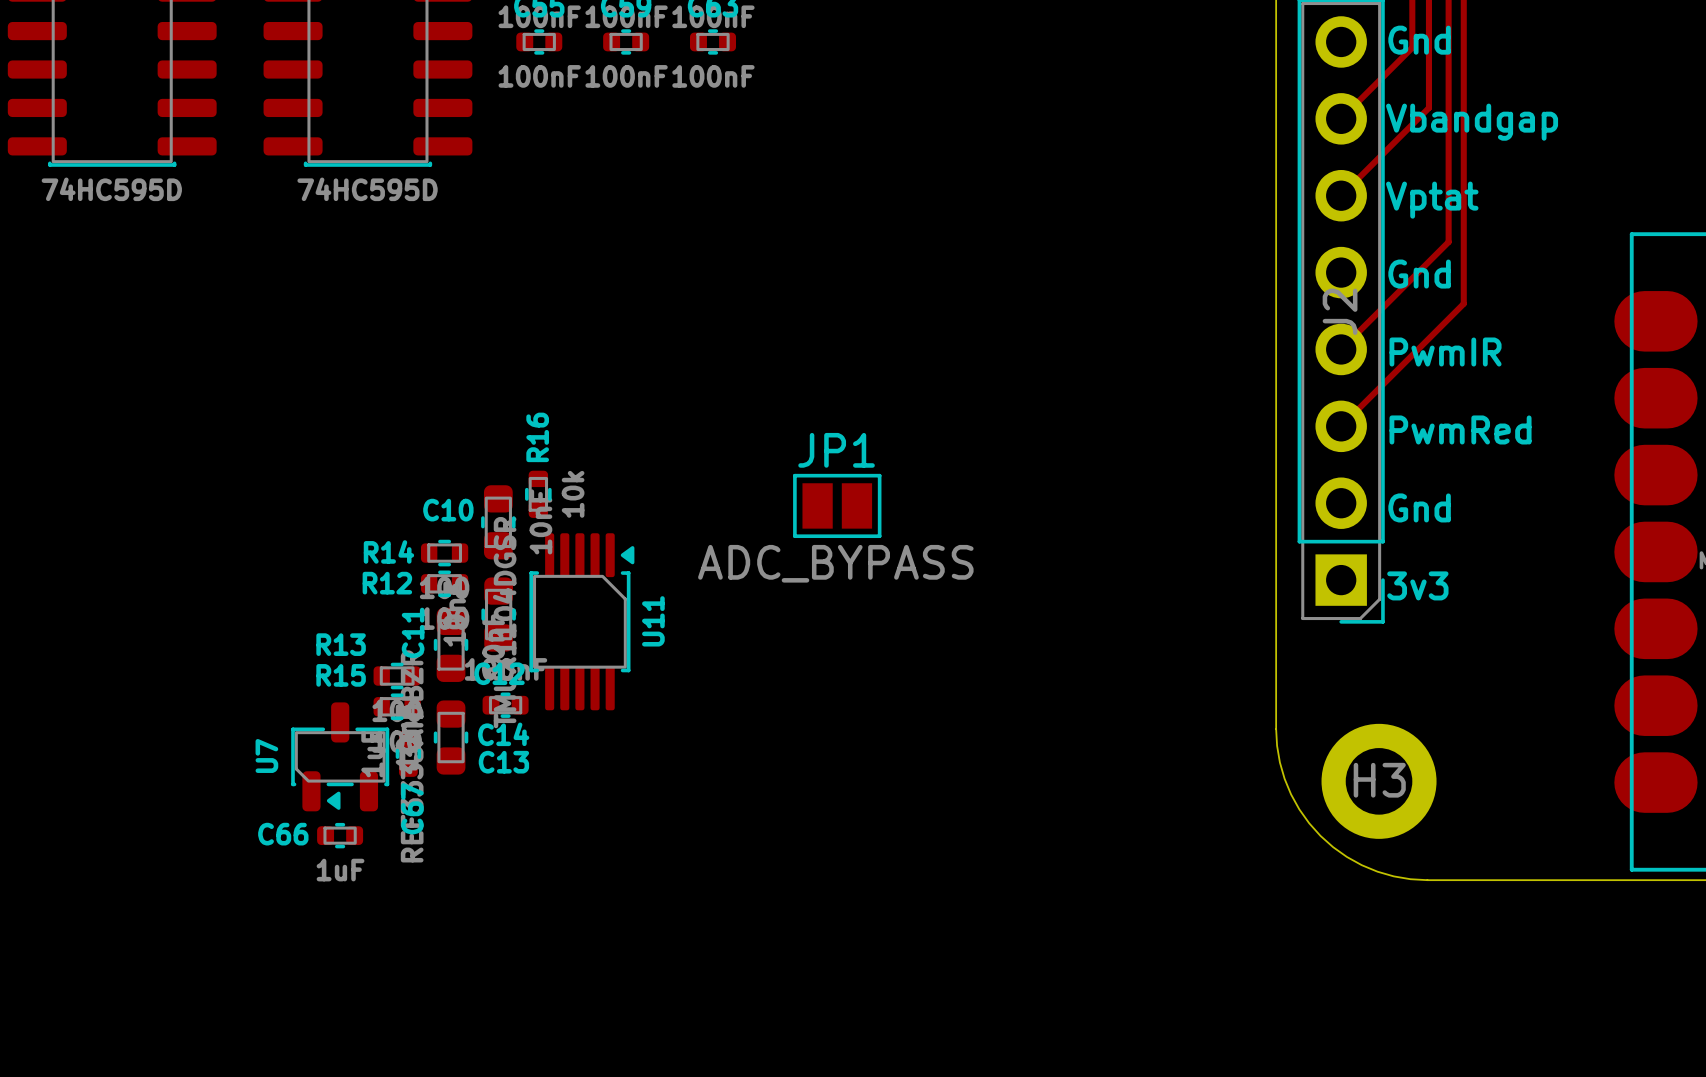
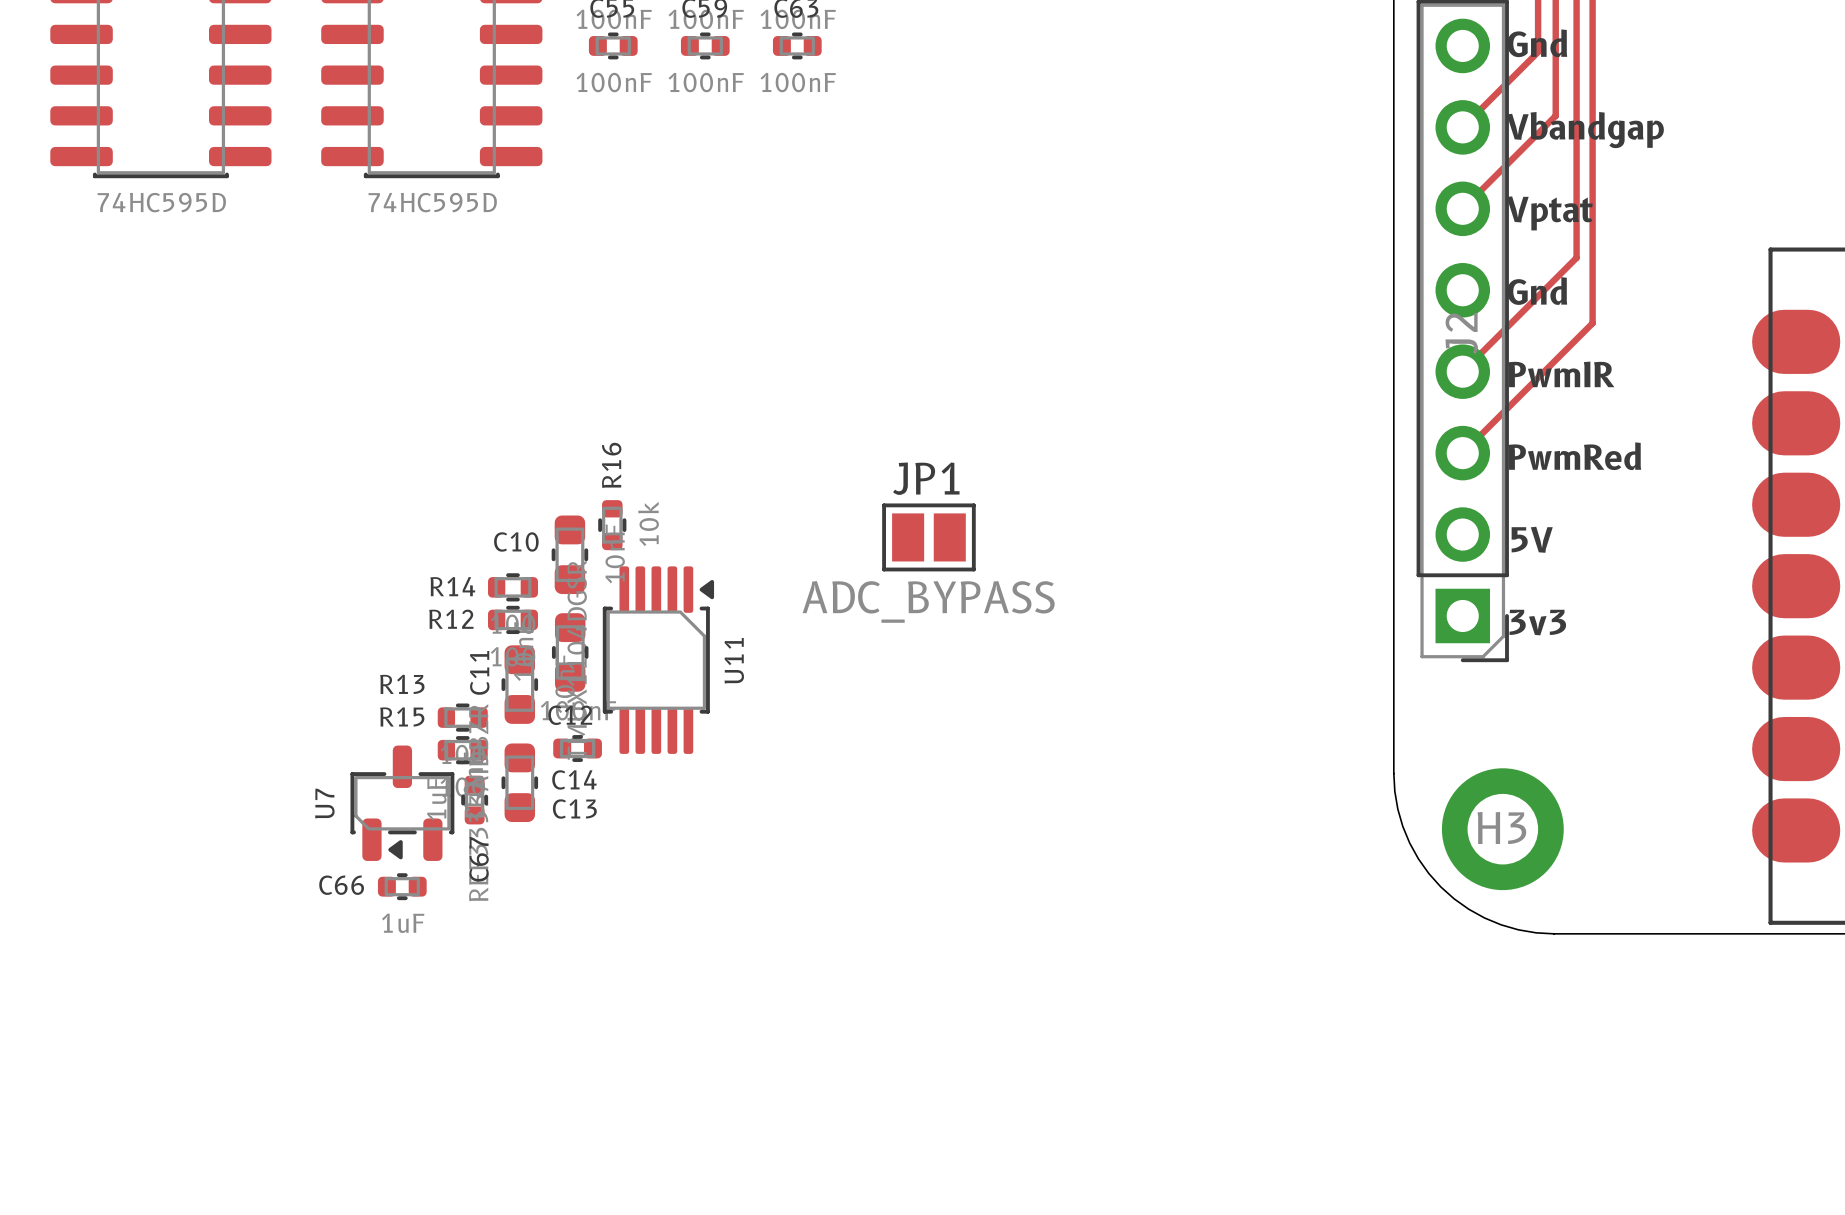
text: Gnd (1419, 507) -> 5V (1532, 539)

